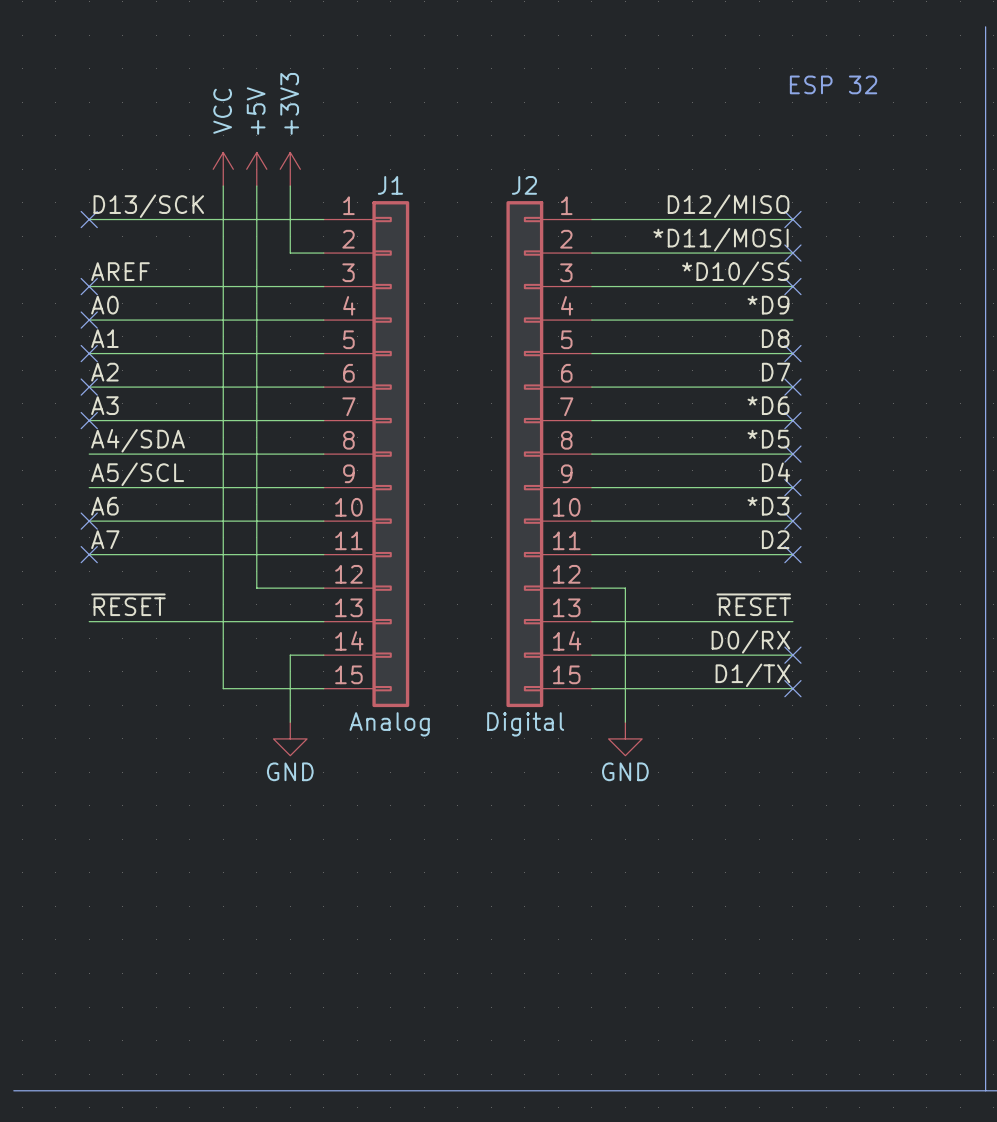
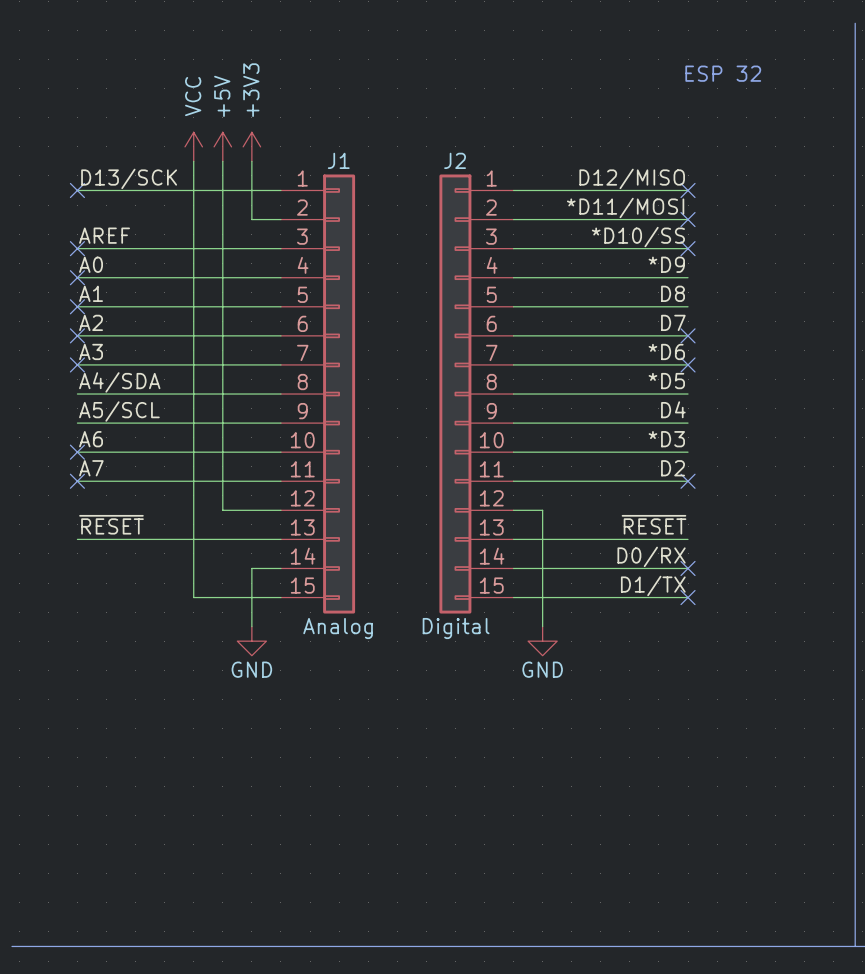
no-connect mark: (792, 353) -> none
no-connect mark: (792, 454) -> none
no-connect mark: (792, 487) -> none
no-connect mark: (792, 521) -> none

